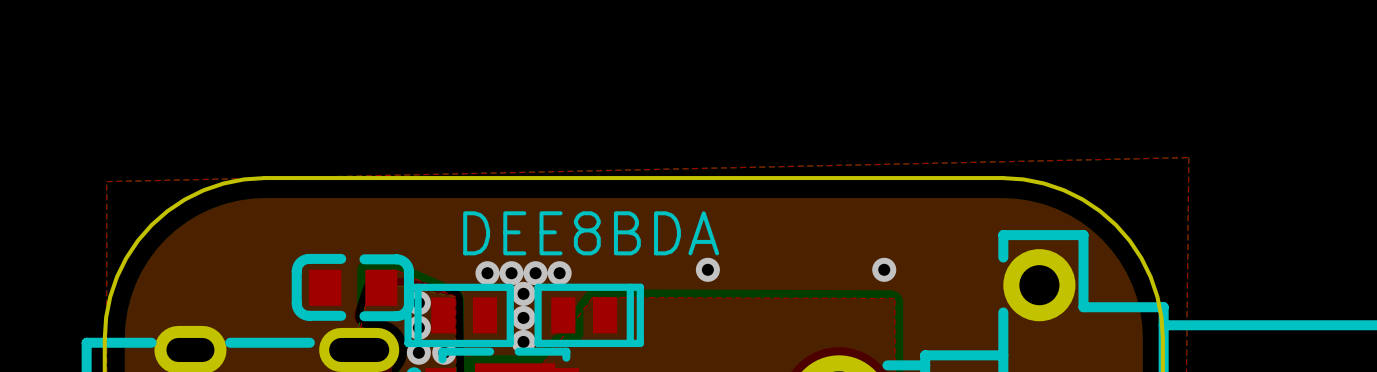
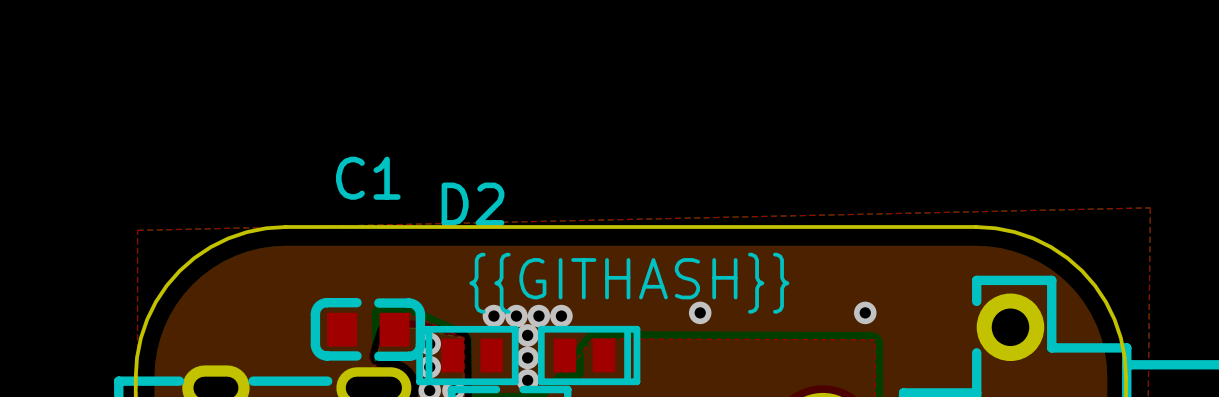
C1 name: none -> C1 (368, 178)
D2 name: none -> D2 (472, 204)
text: DEE8BDA (591, 233) -> {{GITHASH}} (629, 283)

